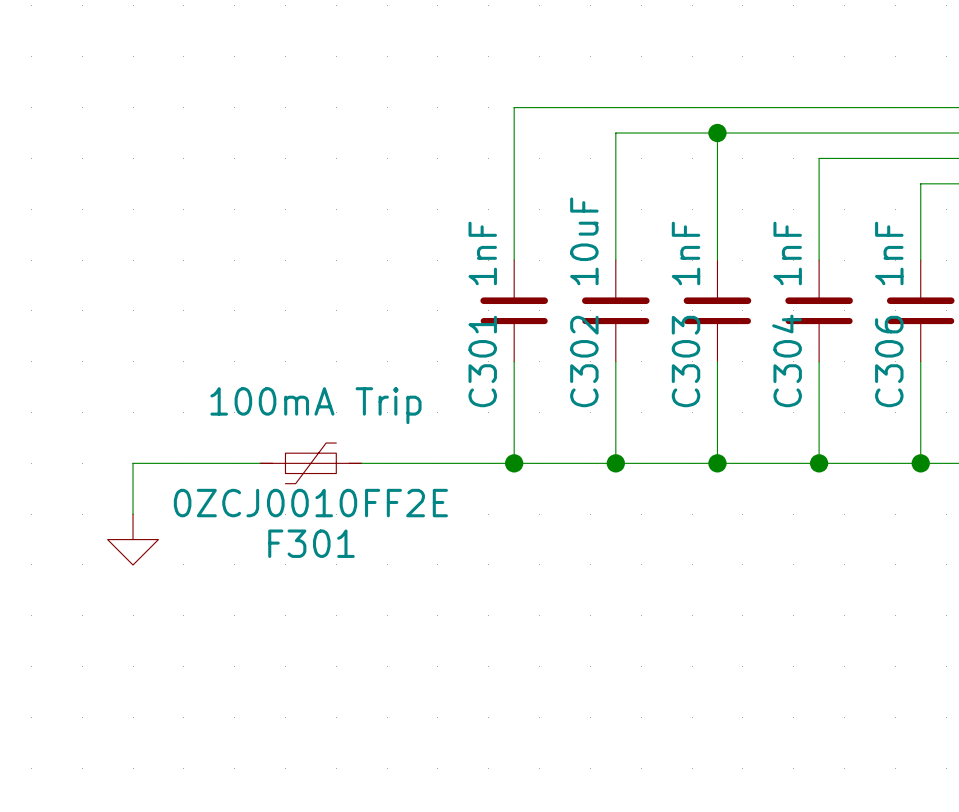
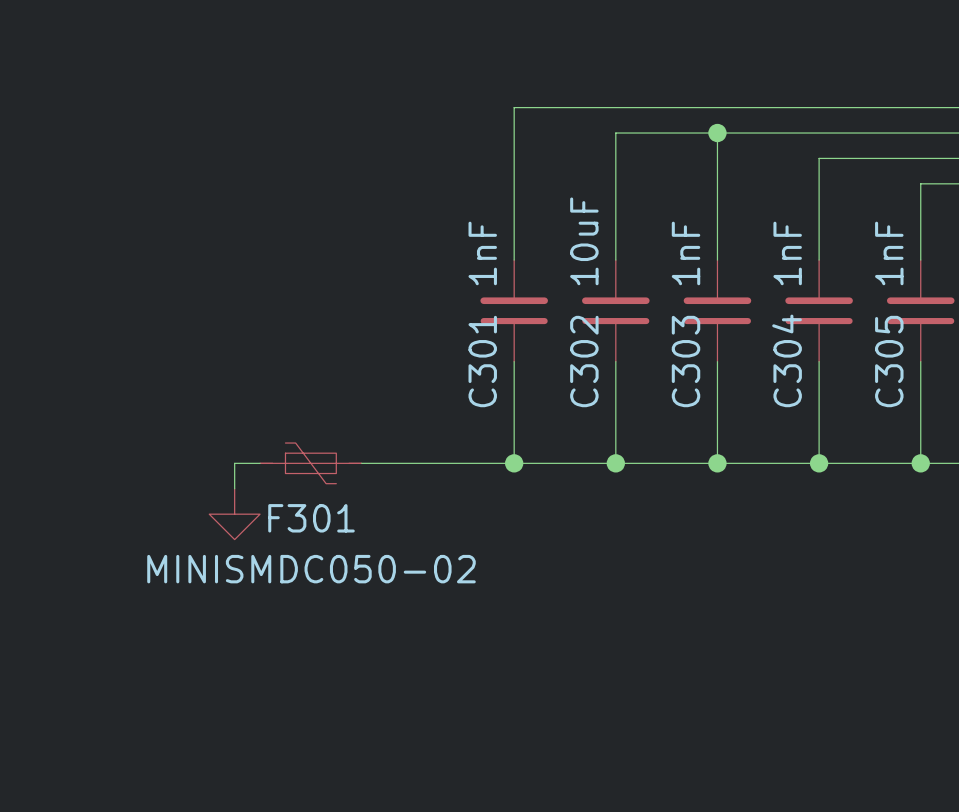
C306 name: C306 (889, 361) -> C305 (889, 361)
F301 text: 100mA Trip (315, 405) -> none
wire: (234, 463) (133, 463) (133, 514) -> (234, 463) (234, 488)
F301 flip: as is (310, 463) -> left-right (310, 463)
F301 value: 0ZCJ0010FF2E (310, 503) -> MINISMDC050-02 (311, 569)
power symbol position: (133, 539) -> (234, 514)

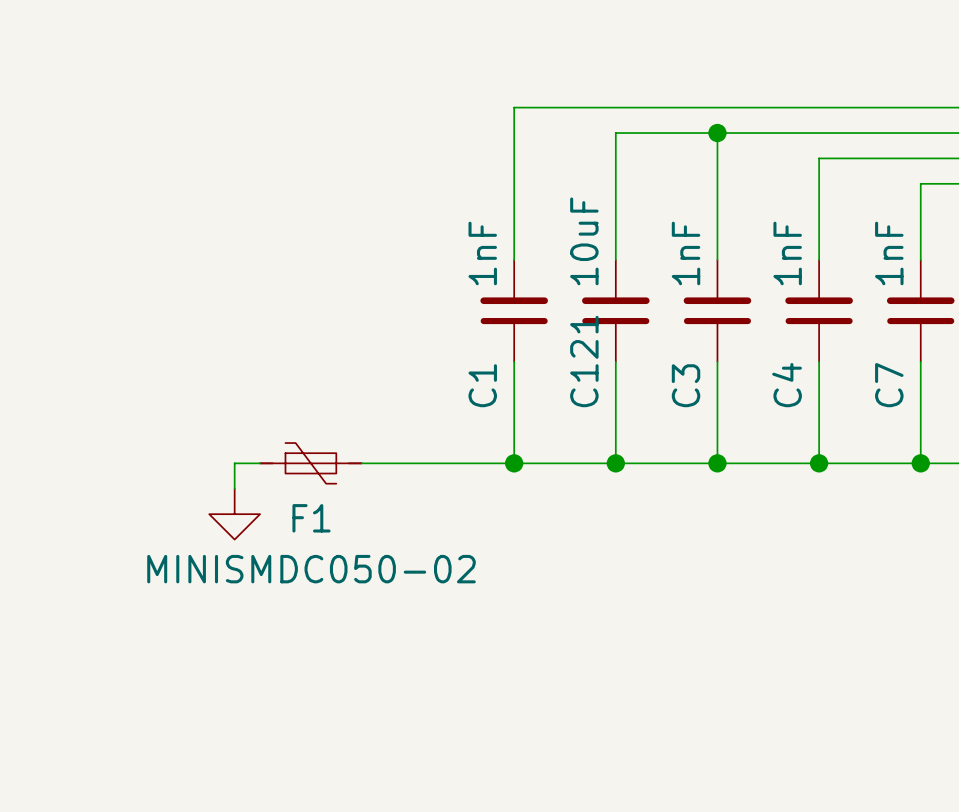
C304 name: C304 (787, 360) -> C4 (787, 385)
C301 name: C301 (482, 361) -> C1 (482, 385)
C302 name: C302 (584, 361) -> C121 (584, 361)
C303 name: C303 (686, 361) -> C3 (686, 385)
C305 name: C305 (889, 361) -> C7 (889, 385)
F301 name: F301 (311, 518) -> F1 (311, 518)

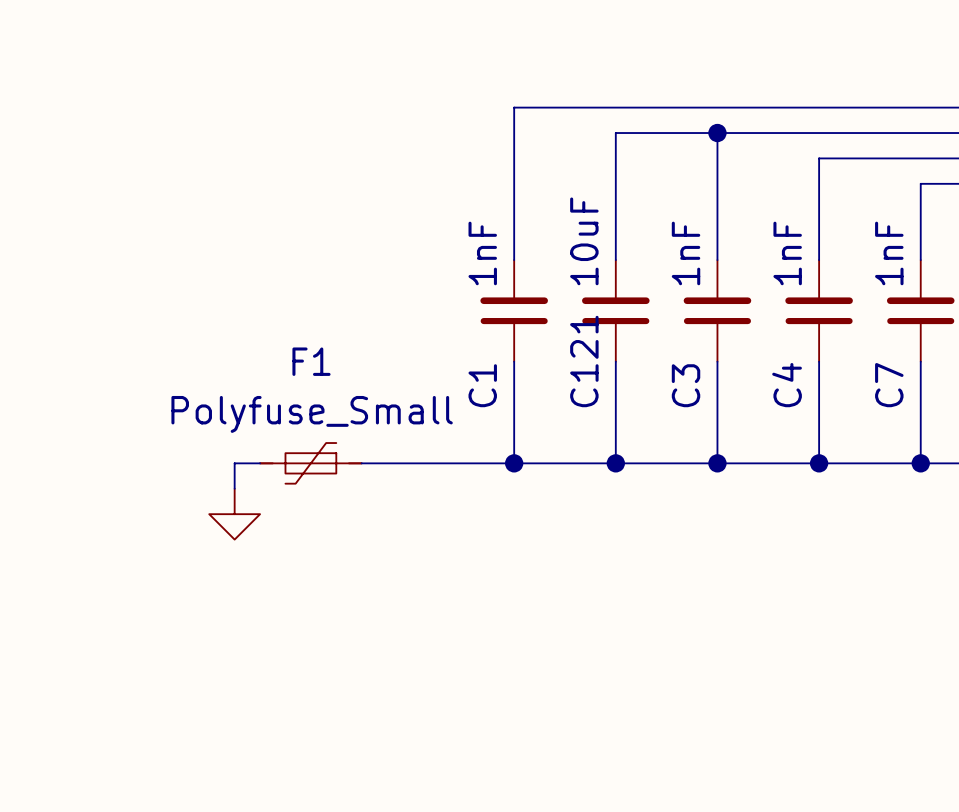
F1 flip: as is (310, 463) -> left-right (310, 463)
F1 name position: F1 (311, 518) -> F1 (311, 361)
F1 value: MINISMDC050-02 (311, 569) -> Polyfuse_Small (312, 414)

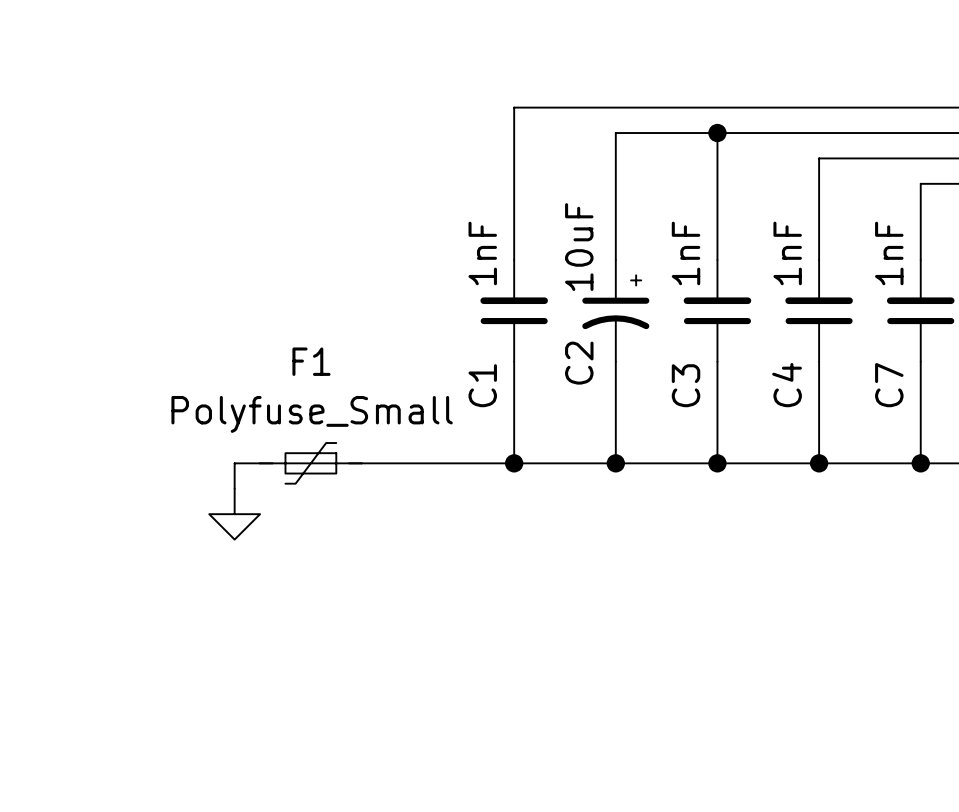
C121: 10uF (615, 310) -> none
C2: none -> 10uF (615, 310)

